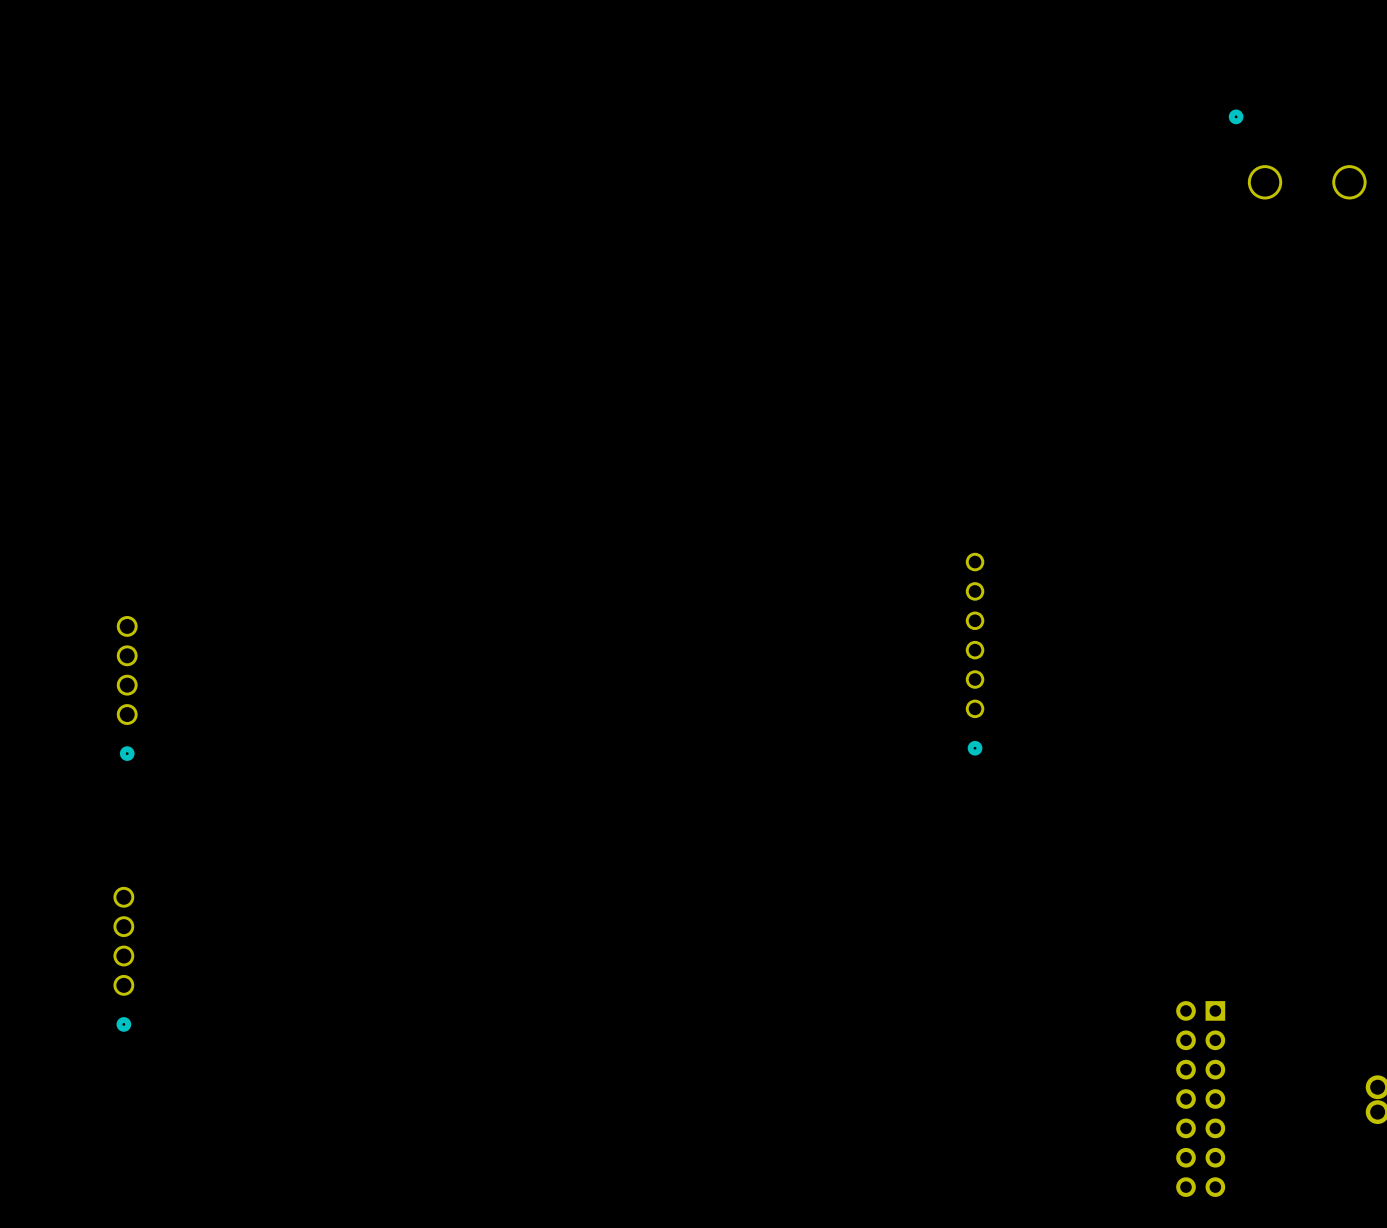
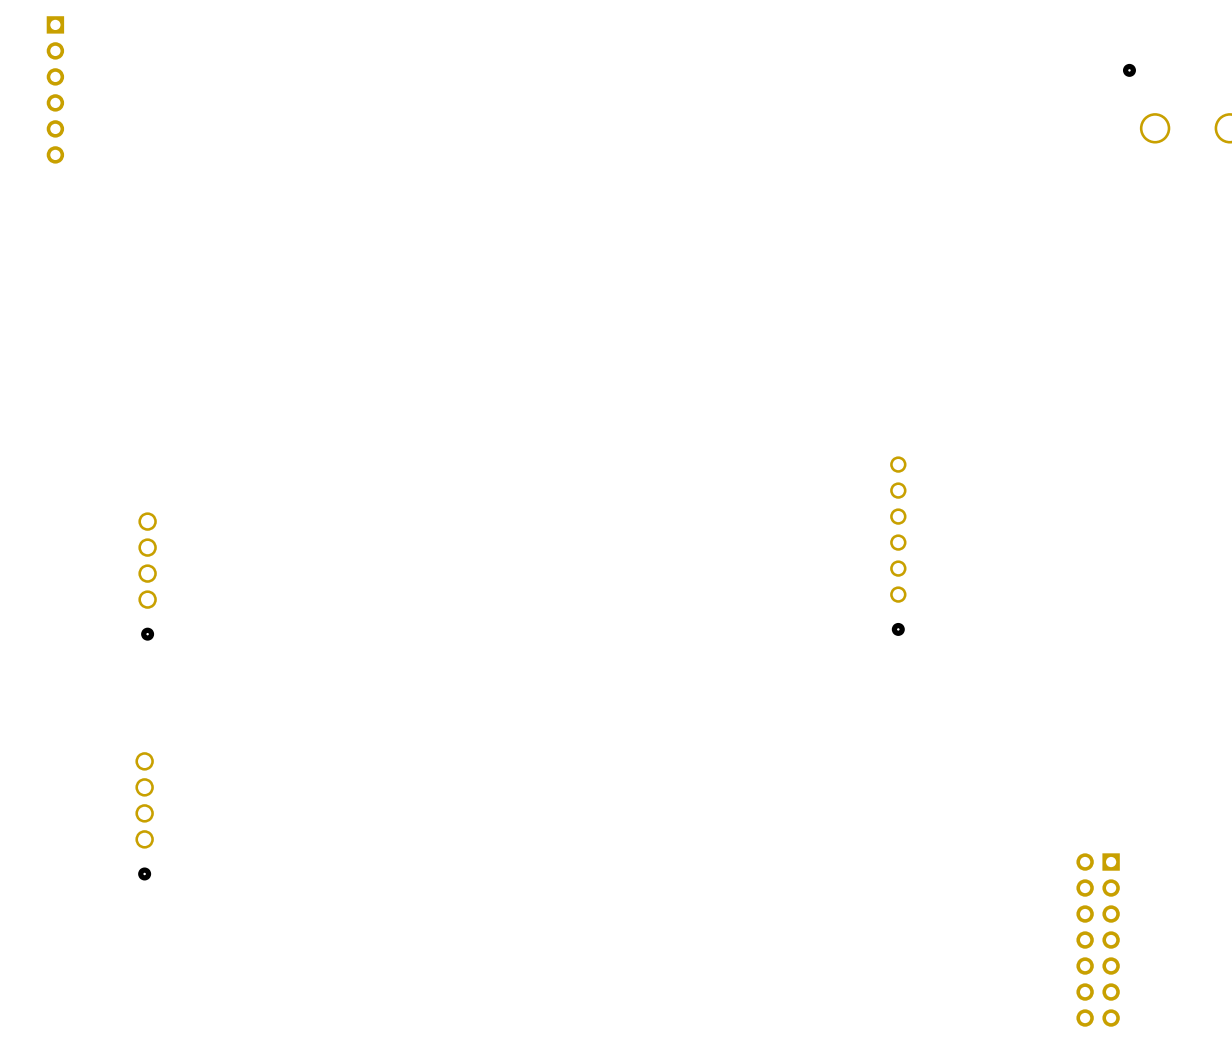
part: none -> (55, 89)

